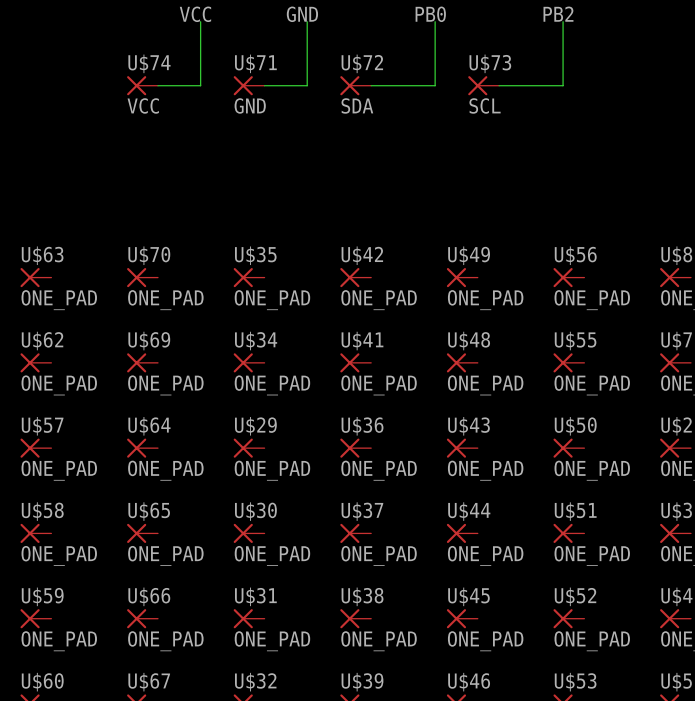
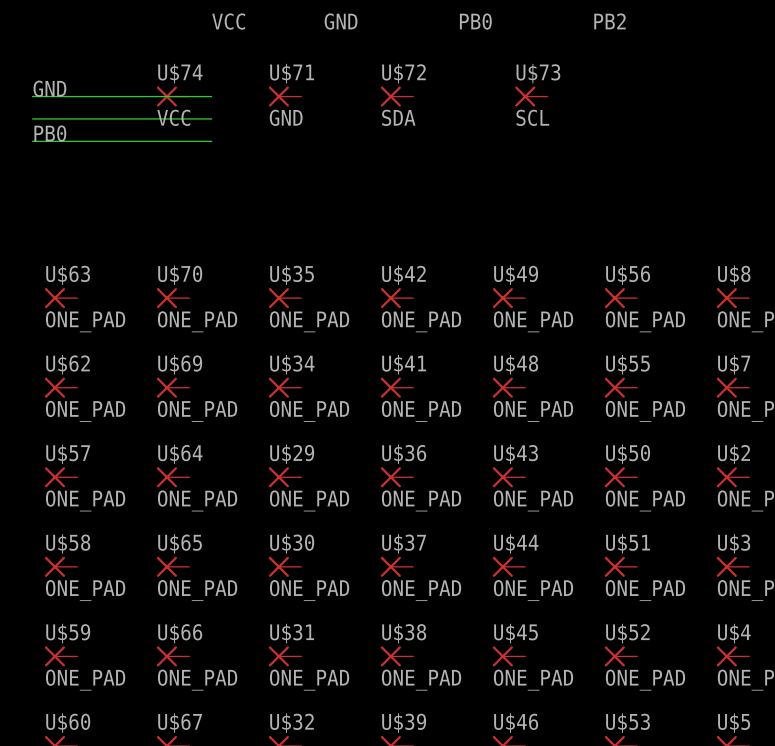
wire: (200, 21) (200, 85) (179, 85) -> none
wire: (307, 21) (307, 85) (264, 85) -> none
wire: (435, 21) (435, 85) (371, 85) -> none
wire: (563, 21) (563, 85) (499, 85) -> none
label: none -> GND (49, 88)
wire: none -> (32, 96) (189, 96)
wire: none -> (32, 118) (211, 118)
label: none -> PB0 (50, 133)
wire: none -> (32, 141) (211, 141)

